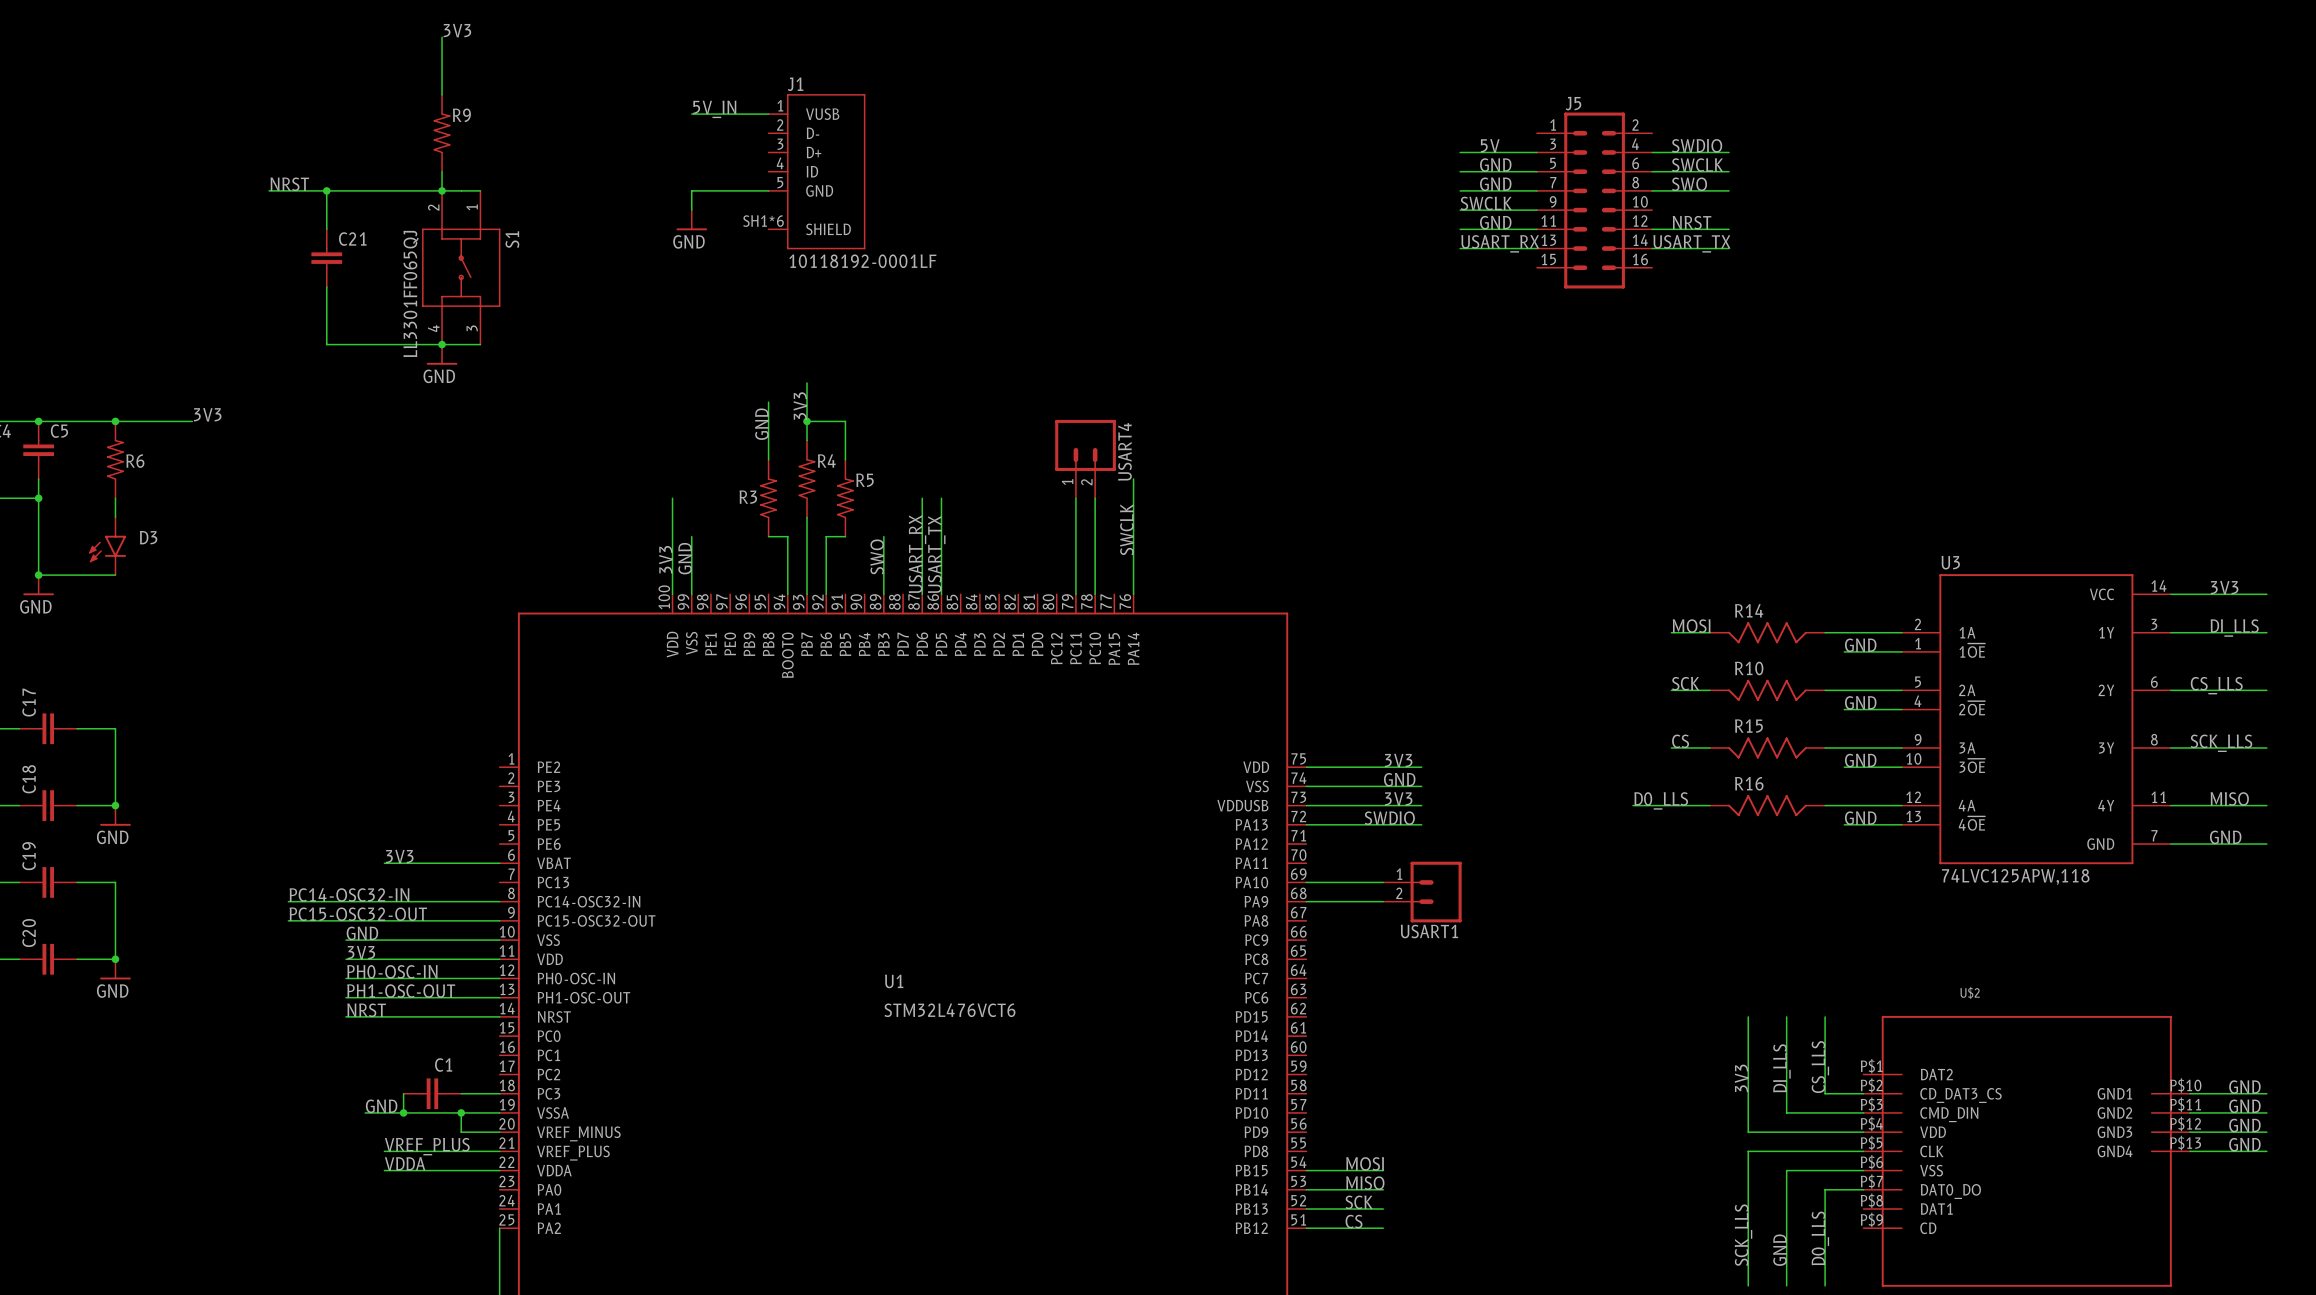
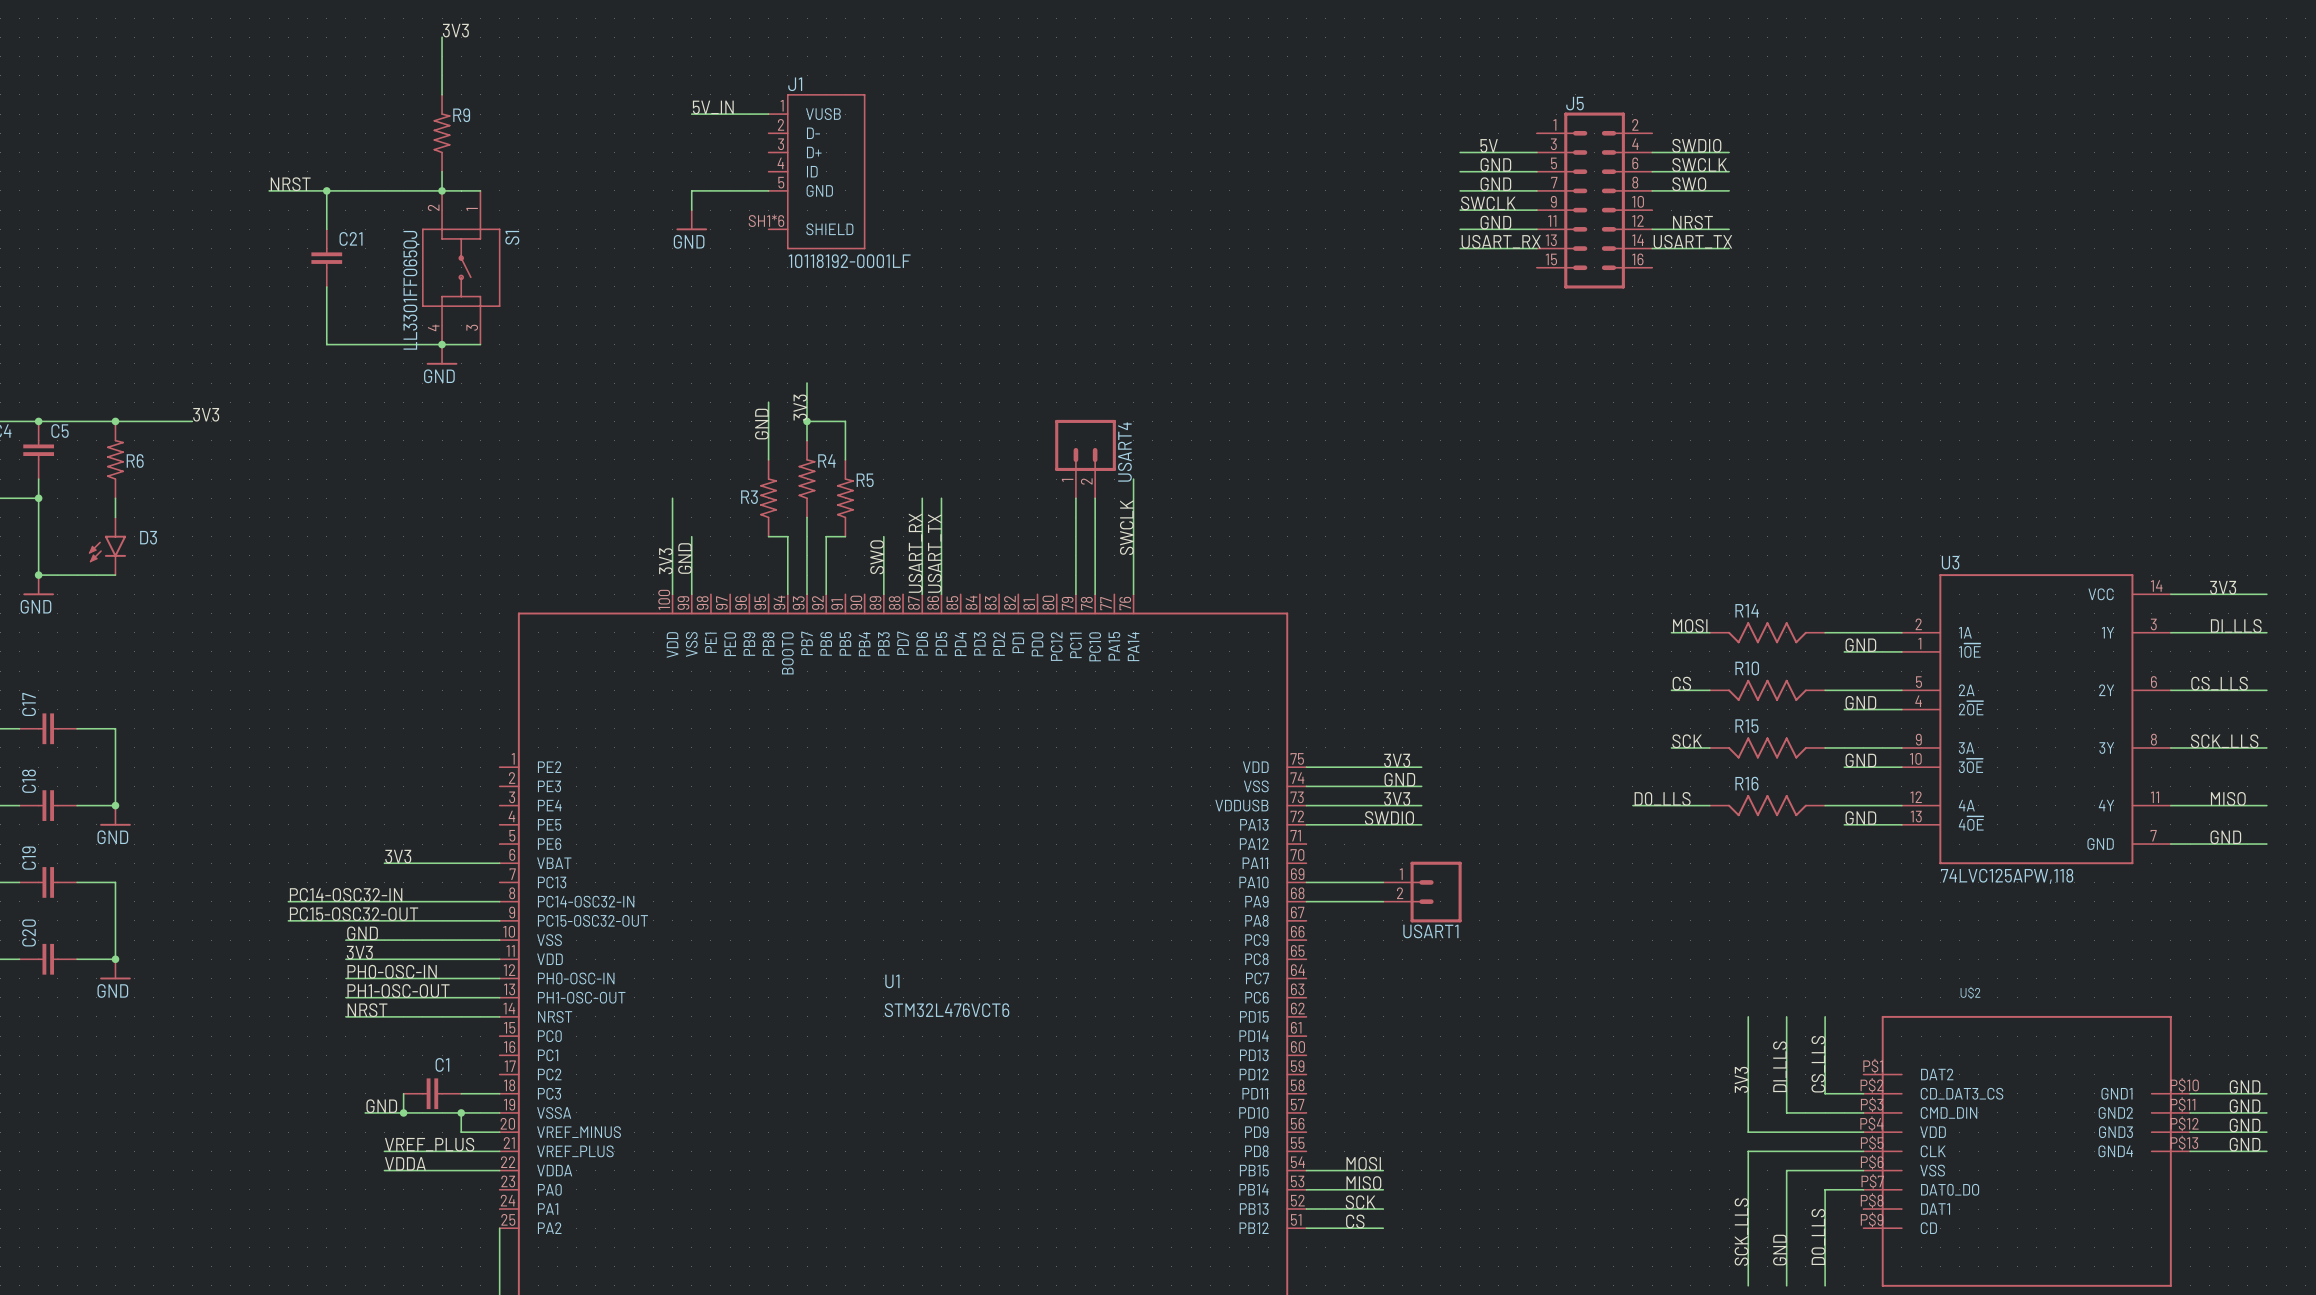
label: SCK (1685, 683) -> CS (1681, 683)
label: CS (1680, 741) -> SCK (1687, 741)

